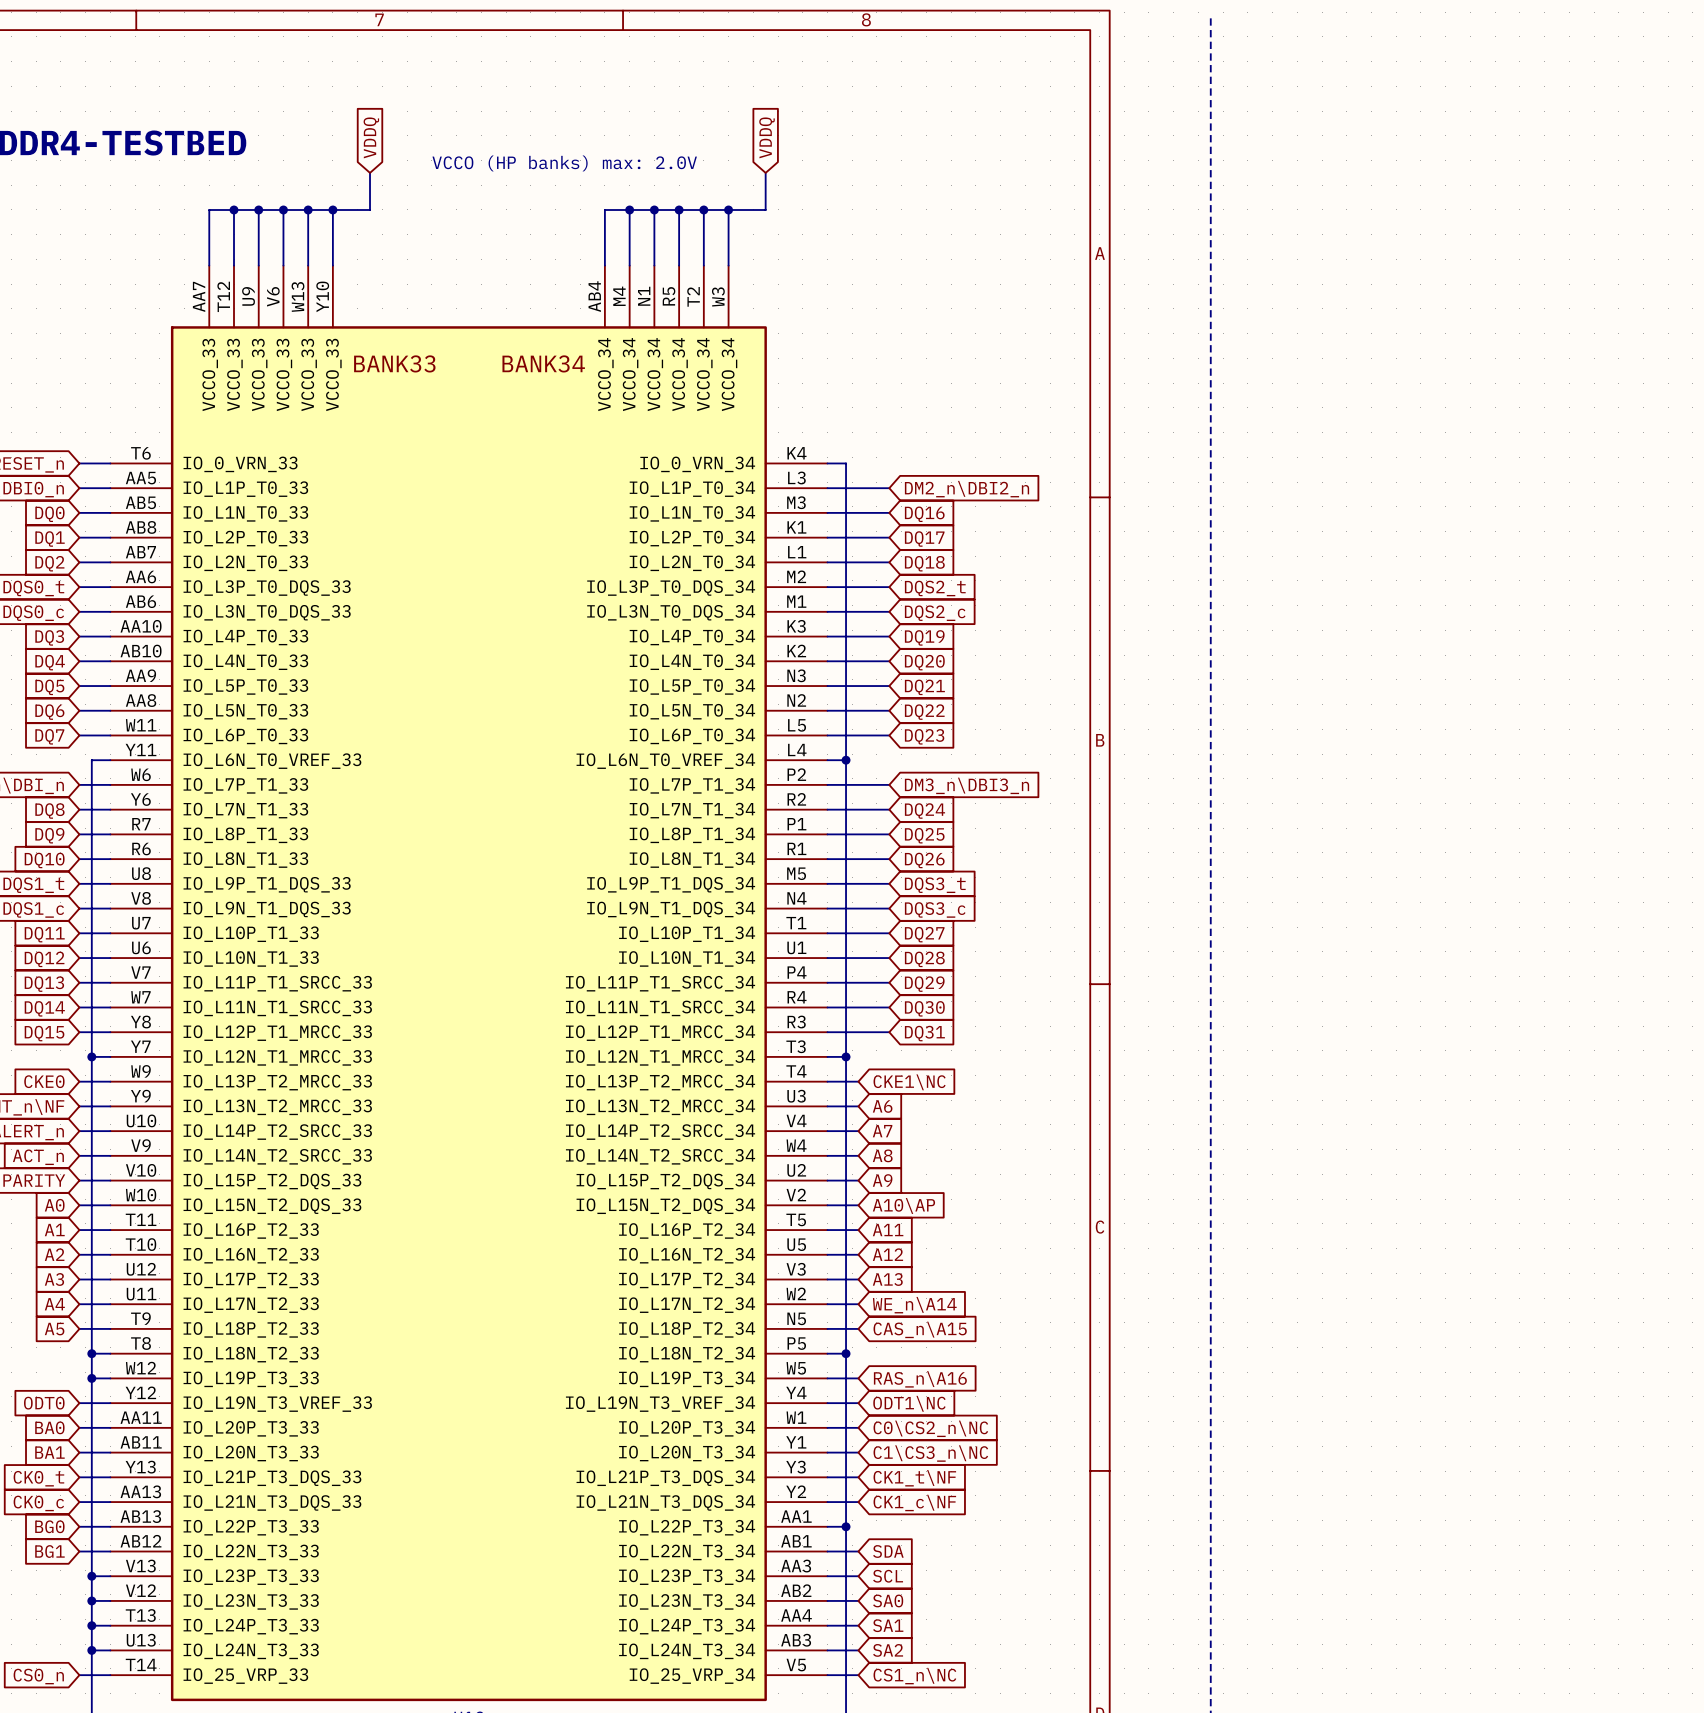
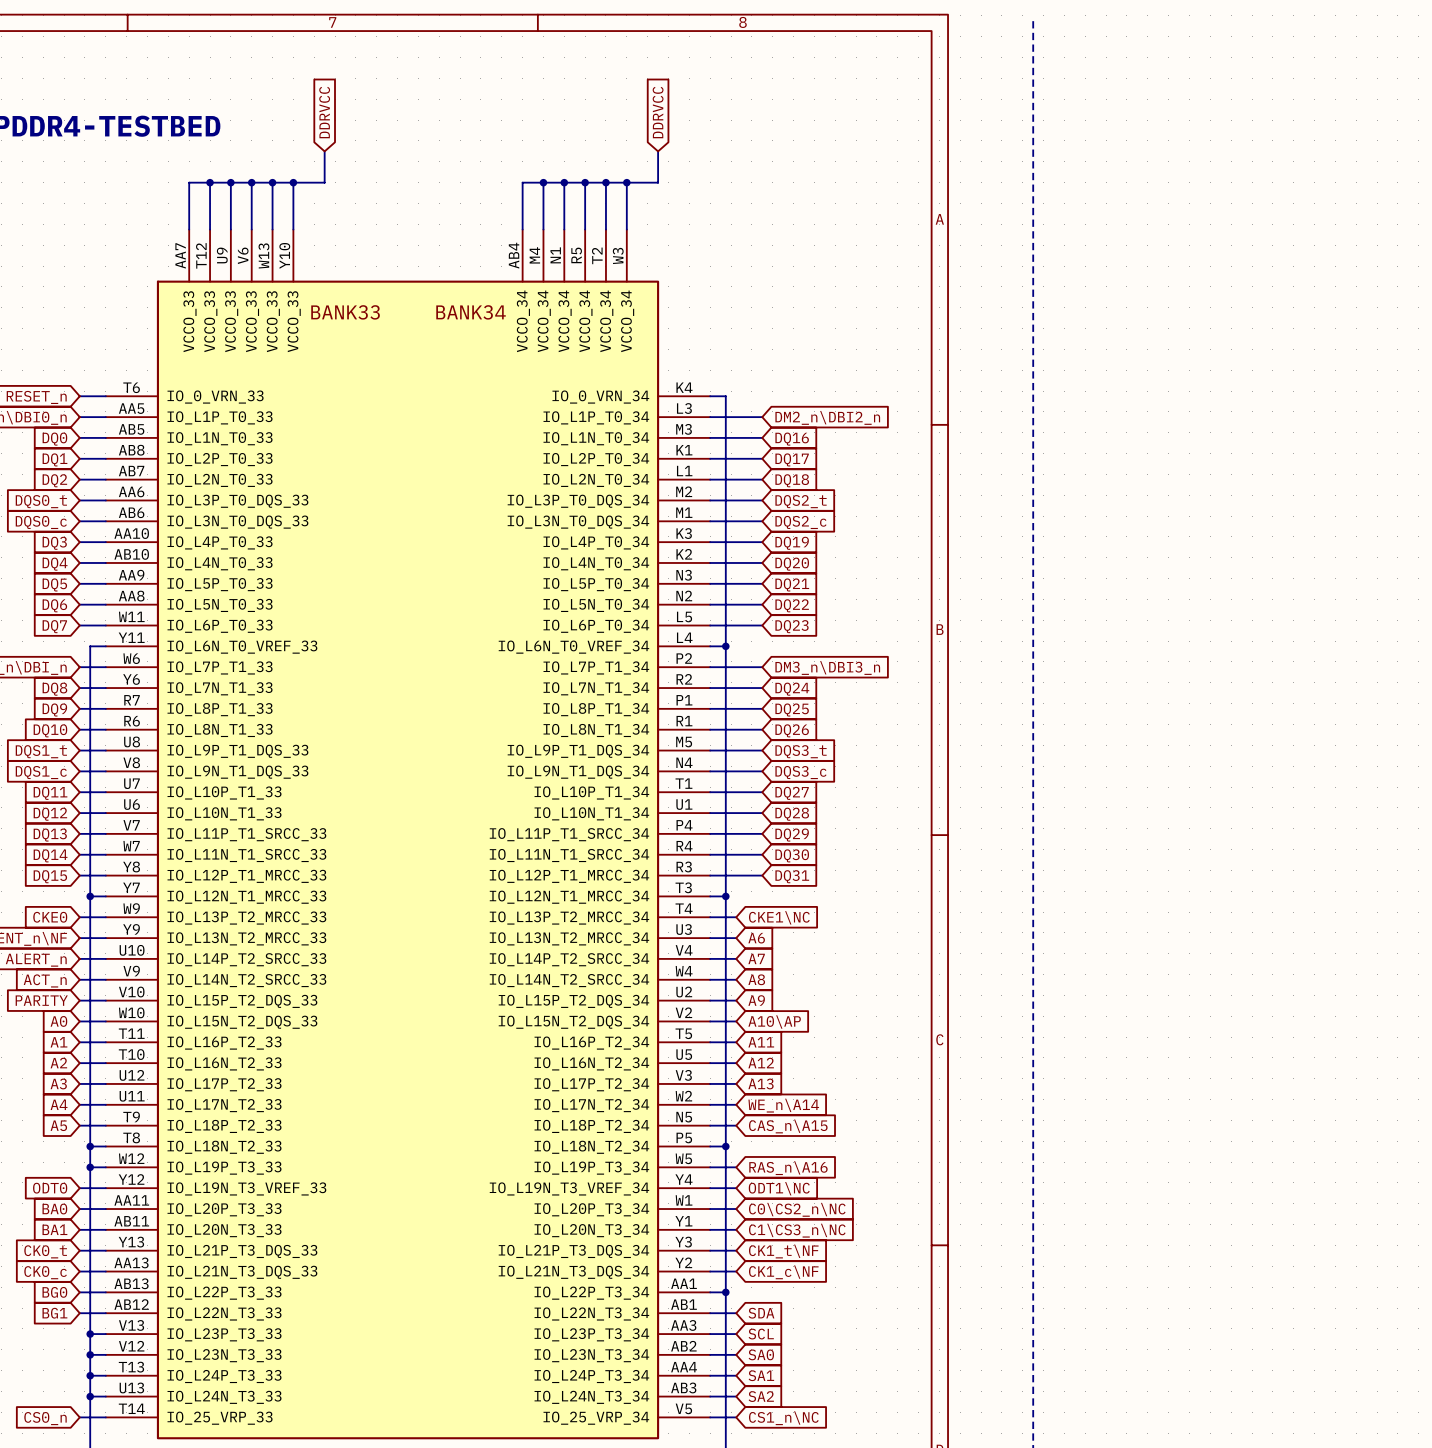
global label: VDDQ (371, 137) -> DDRVCC (324, 112)
global label: VDDQ (767, 137) -> DDRVCC (658, 112)
text: VCCO (HP banks) max: 2.0V (564, 163) -> none

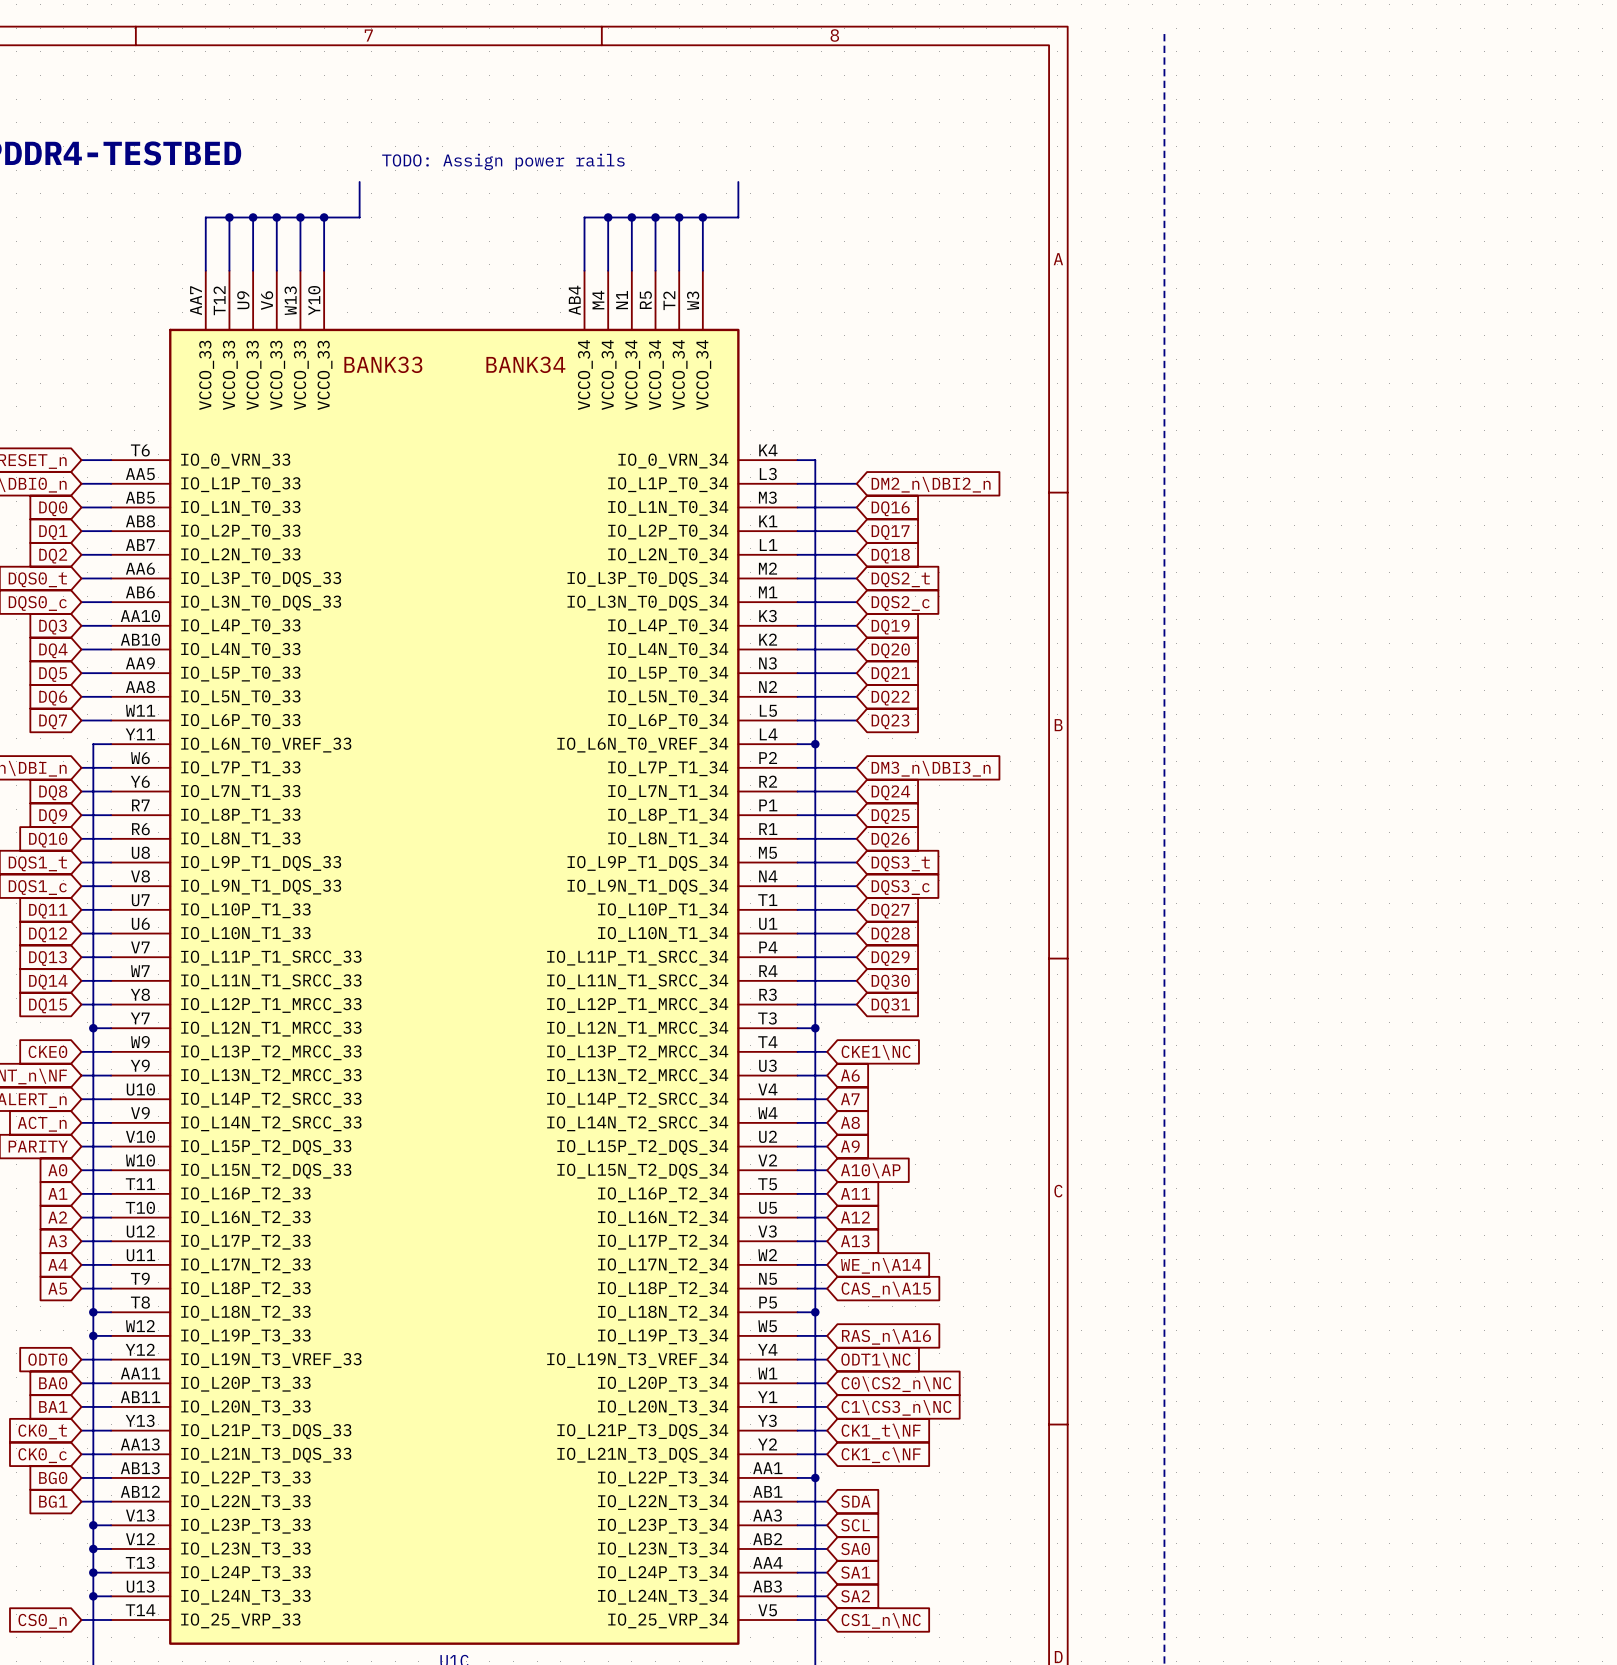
global label: DDRVCC (324, 112) -> none
global label: DDRVCC (658, 112) -> none
text: none -> TODO: Assign power rails (503, 161)

